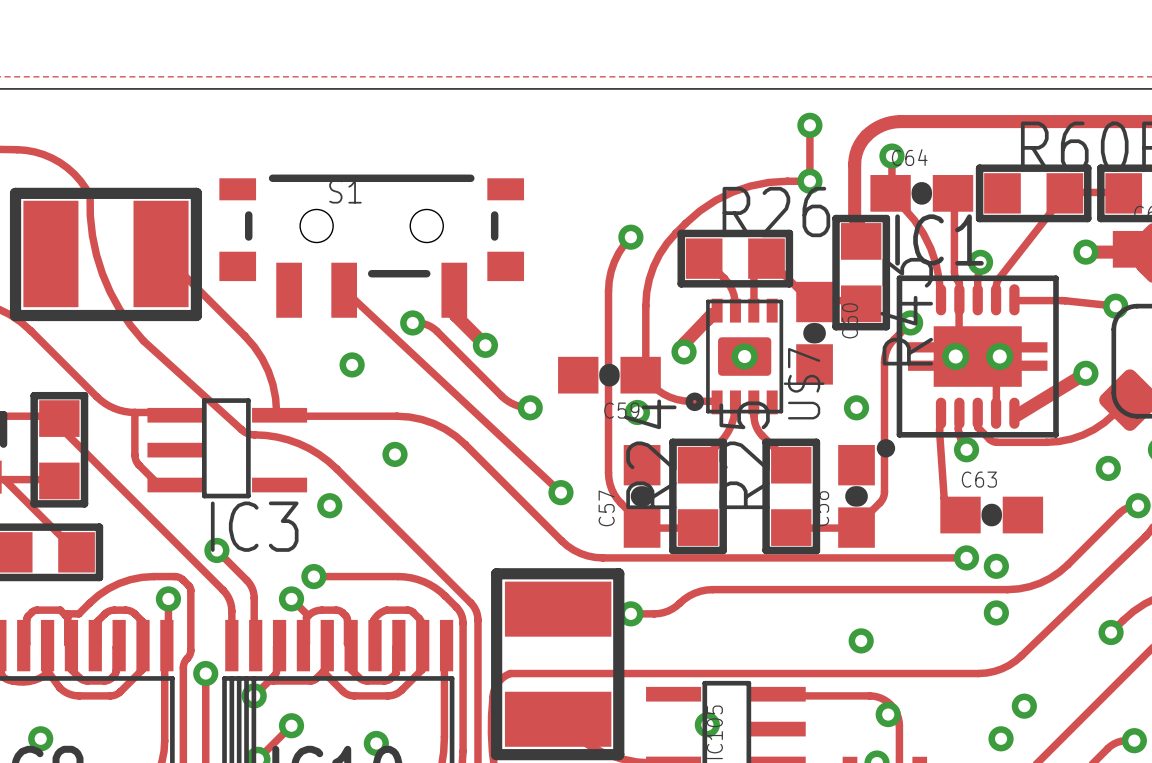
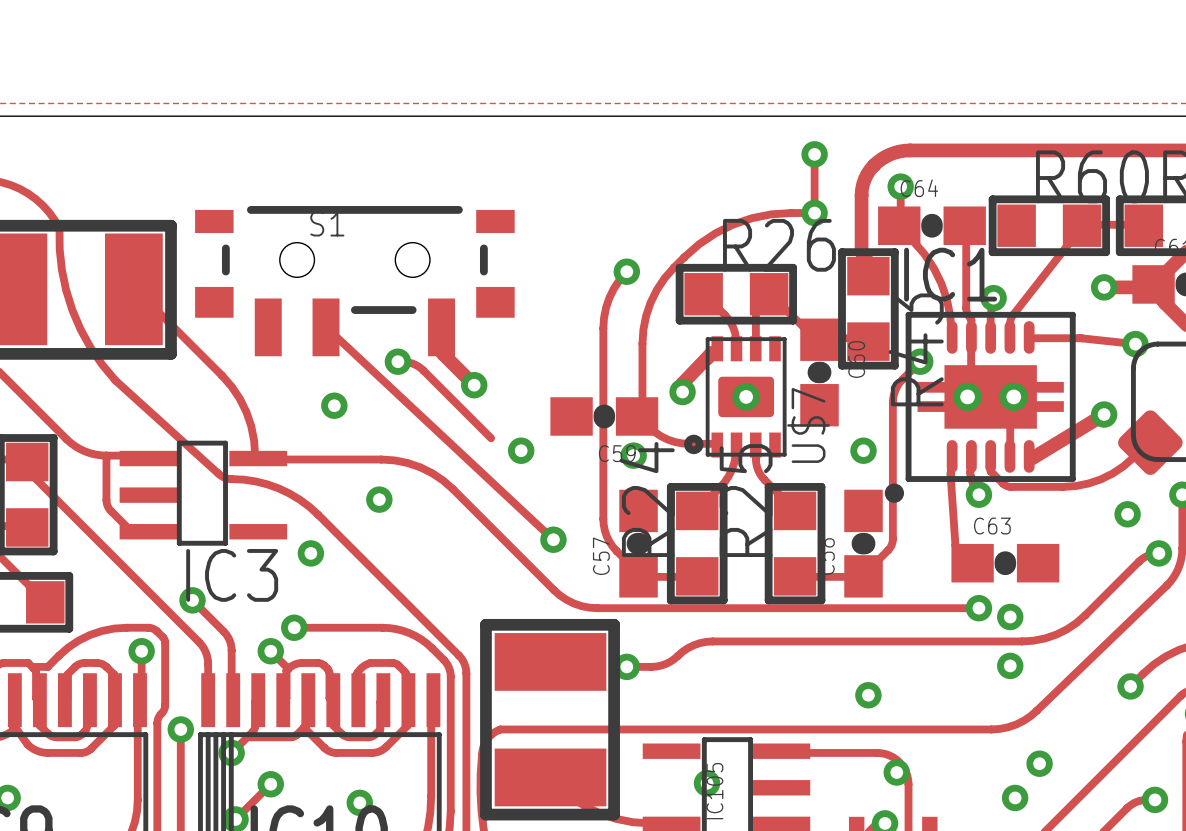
track: (501, 395) (514, 404) (530, 407) -> none

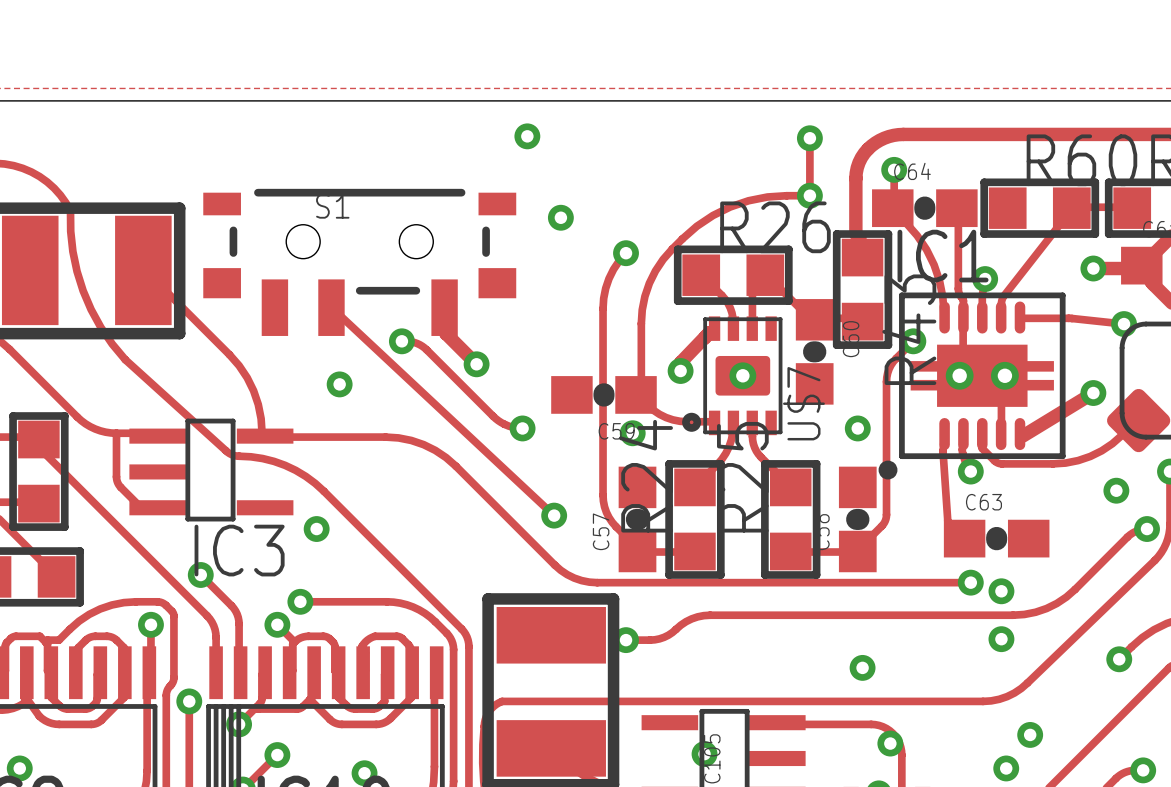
via: none -> (527, 136)
via: none -> (560, 217)
track: none -> (493, 416) (508, 426) (522, 428)
via: (379, 499) -> none

